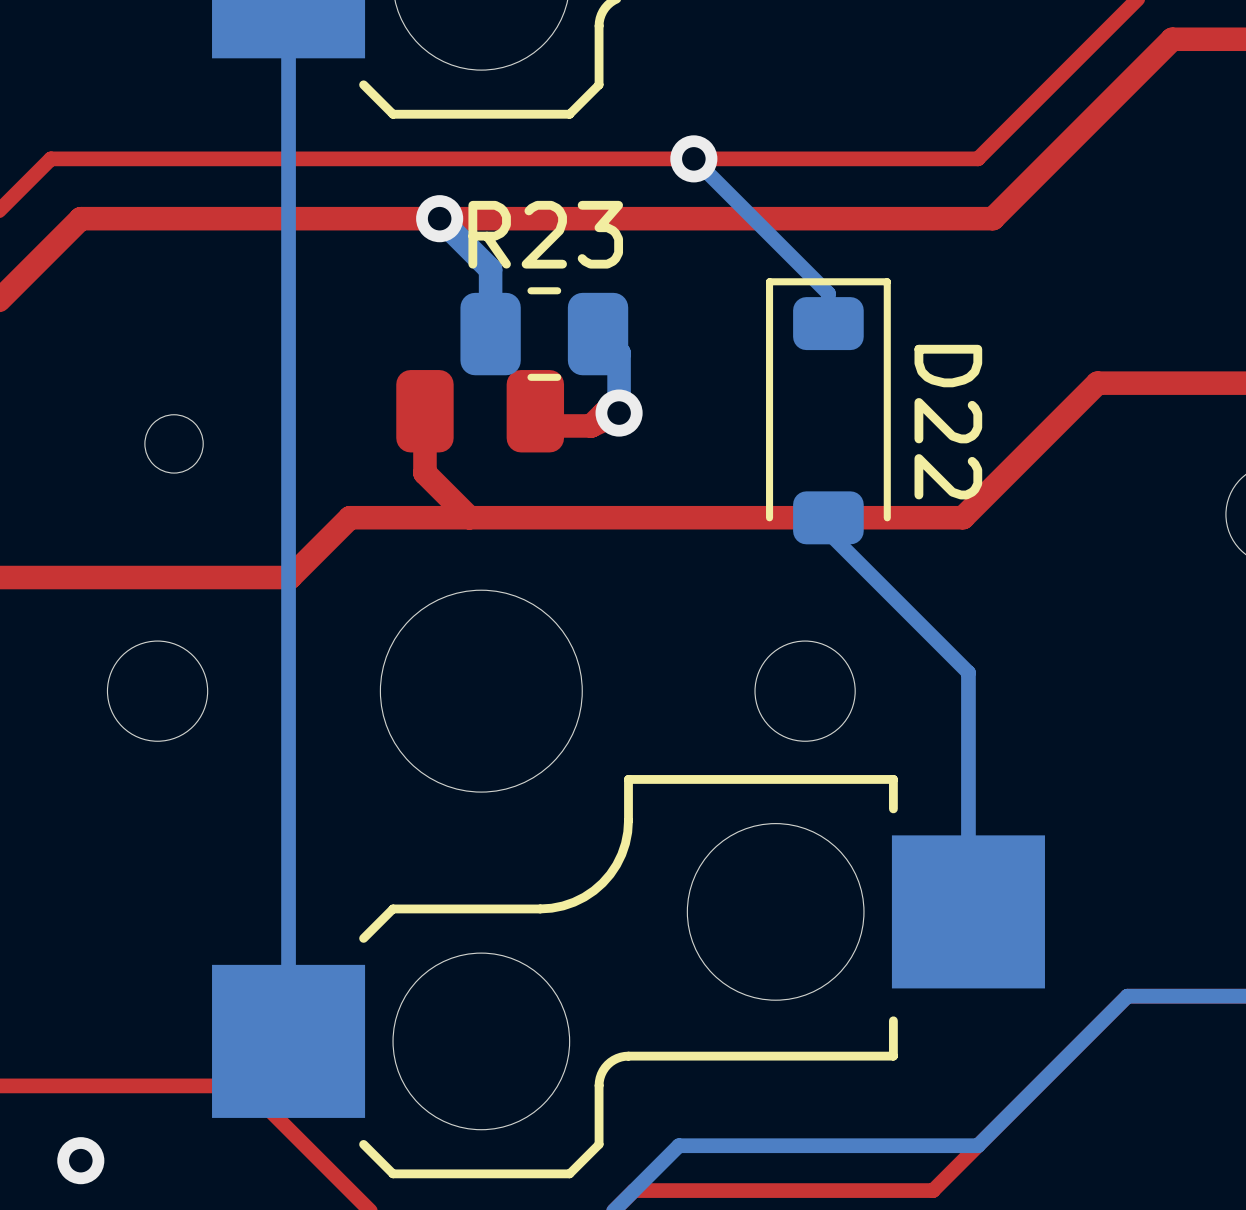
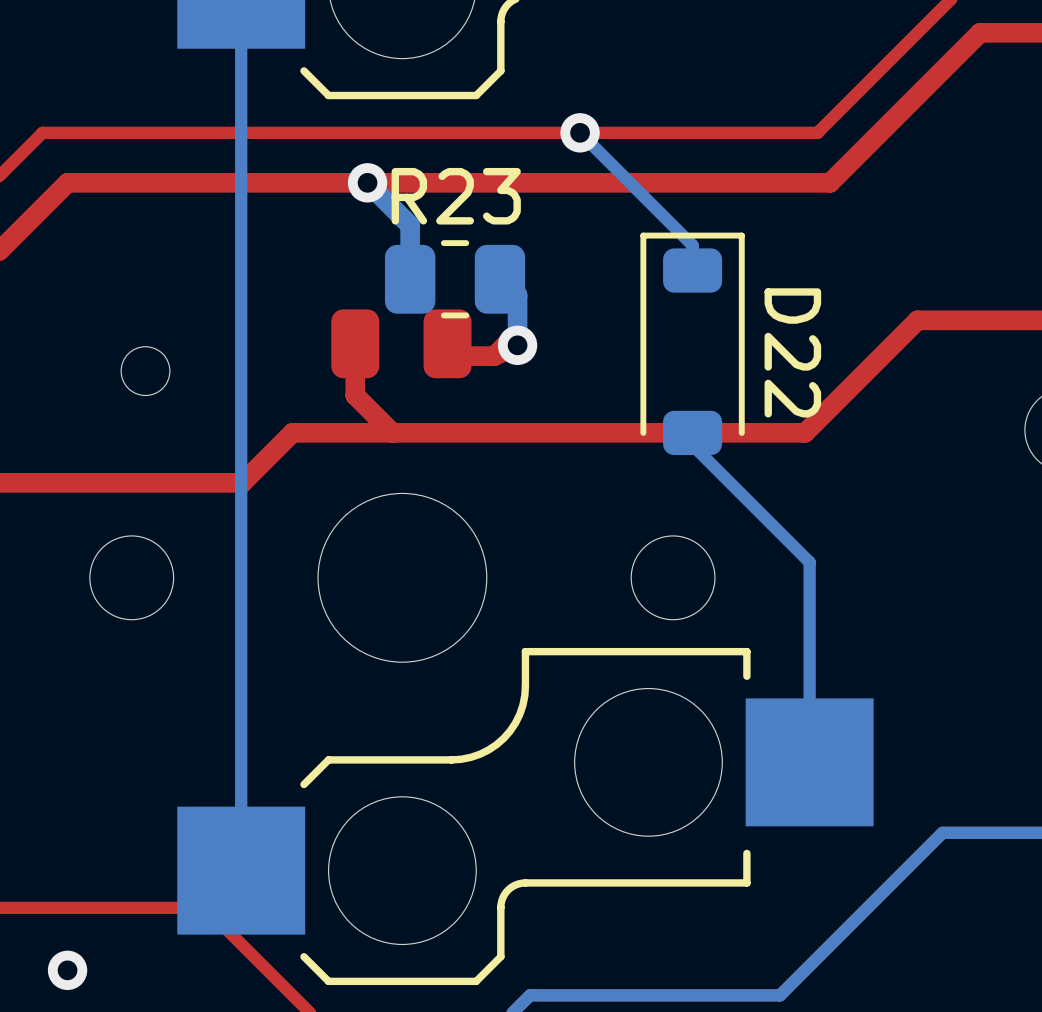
bottom track: (977, 1145) (678, 1145) (634, 1190) -> (817, 957) (780, 995) (530, 995)

